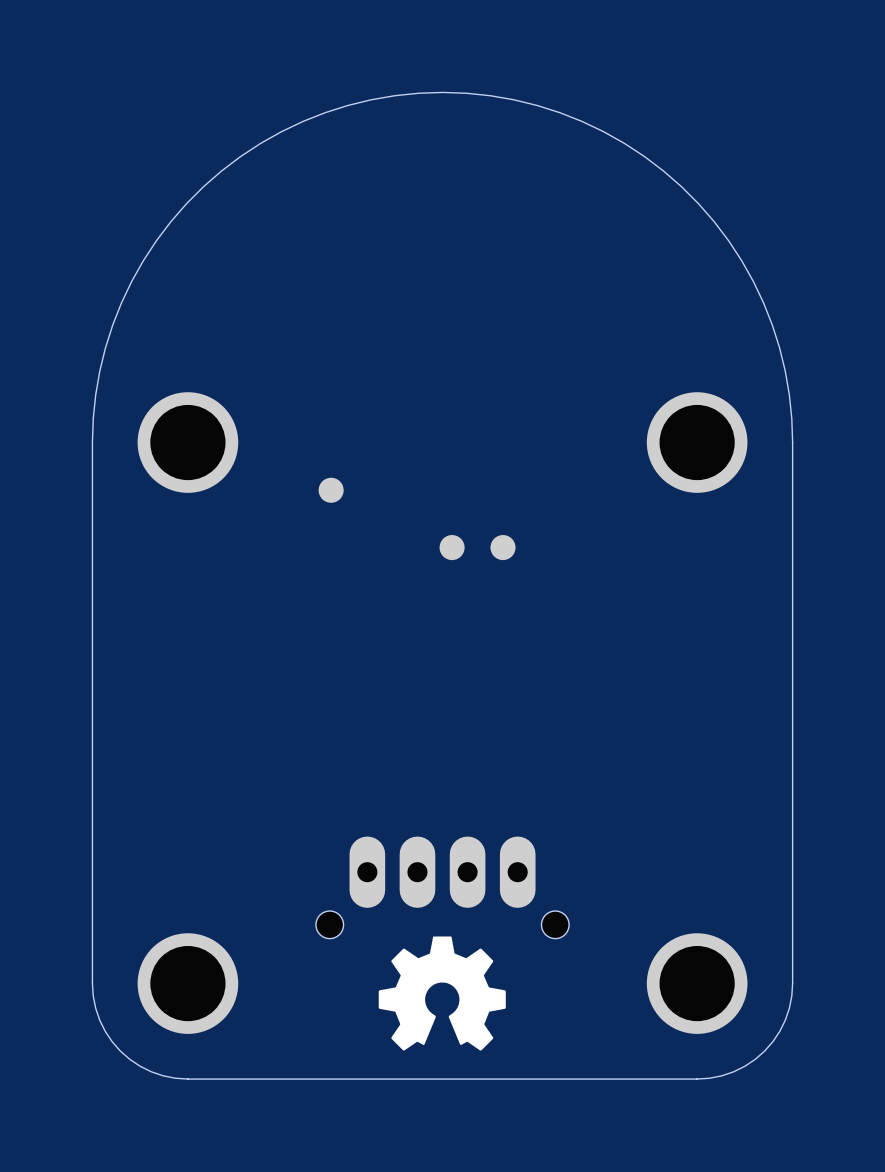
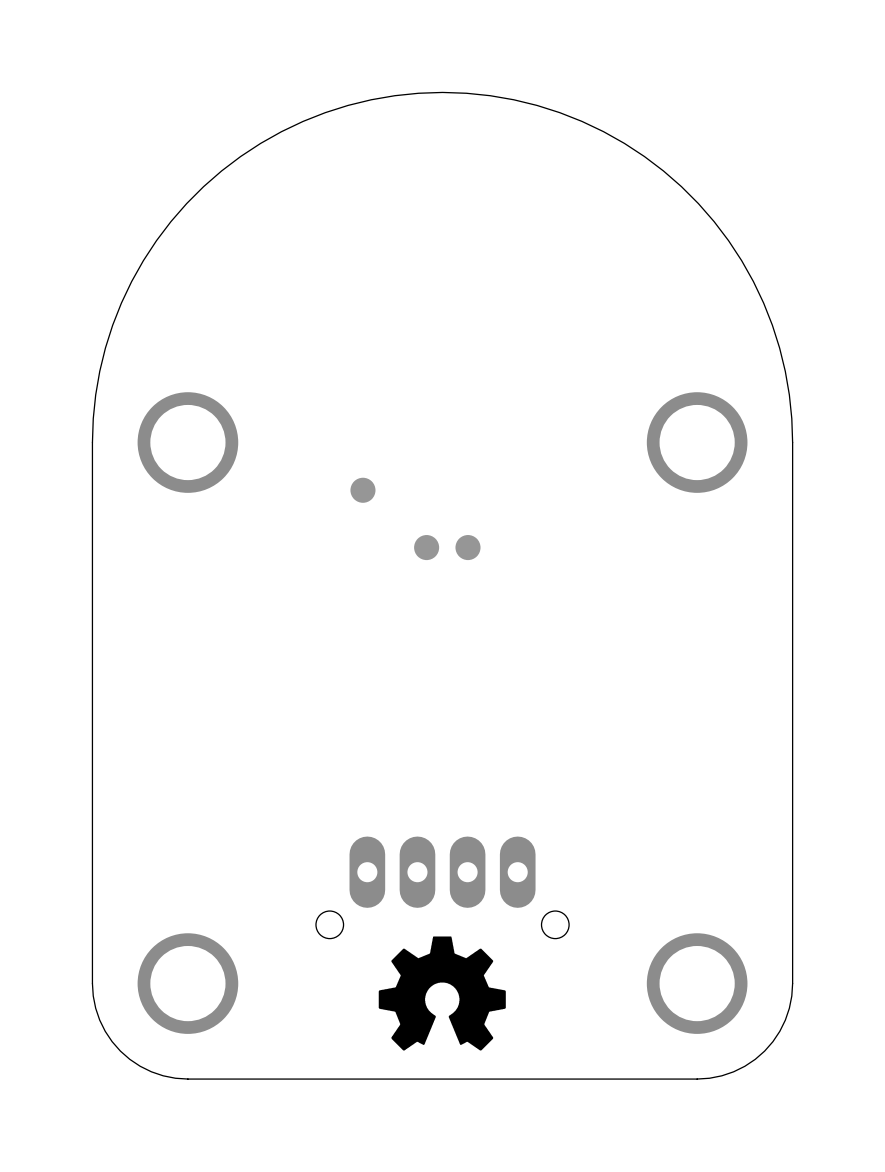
part position: (331, 490) -> (362, 490)
part: none -> (426, 547)
part: (452, 547) -> none
part: none -> (467, 547)
part: (503, 547) -> none

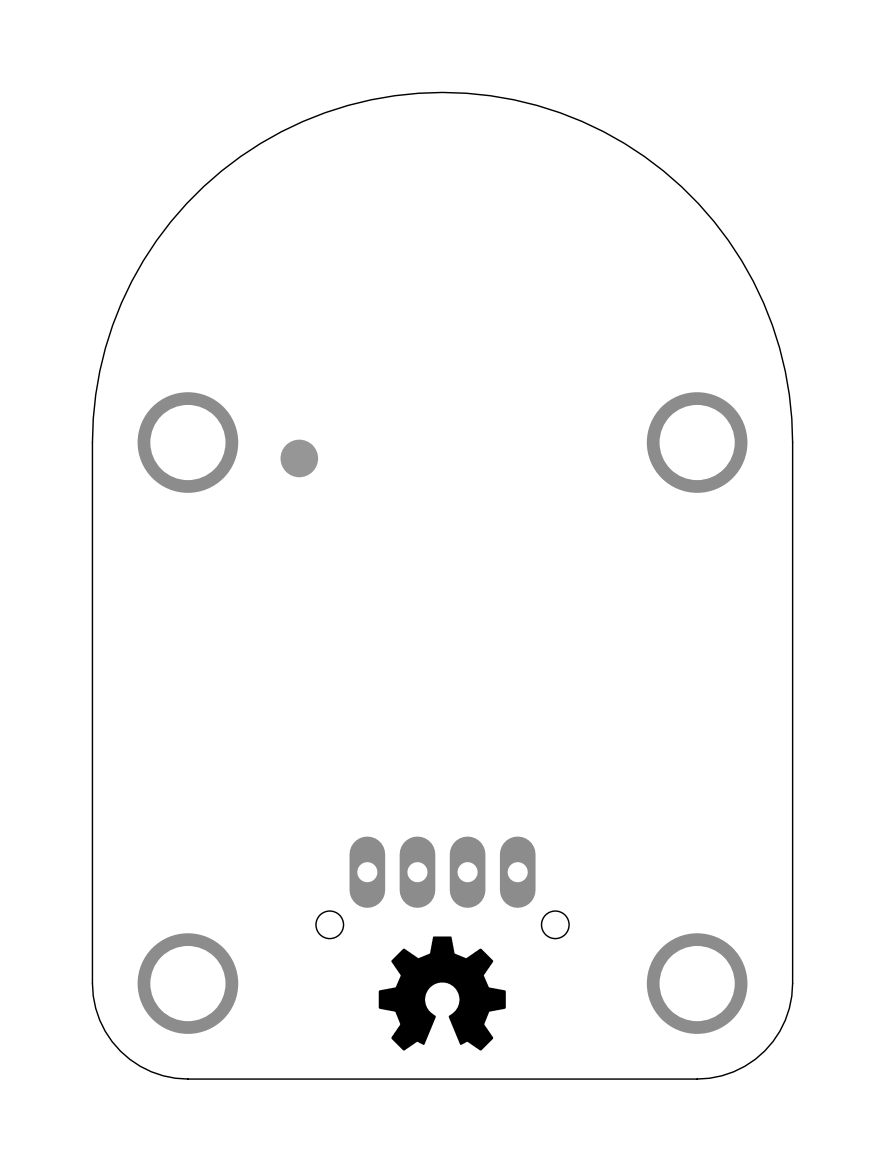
part: none -> (299, 458)
part: (362, 490) -> none
part: (426, 547) -> none
part: (467, 547) -> none

